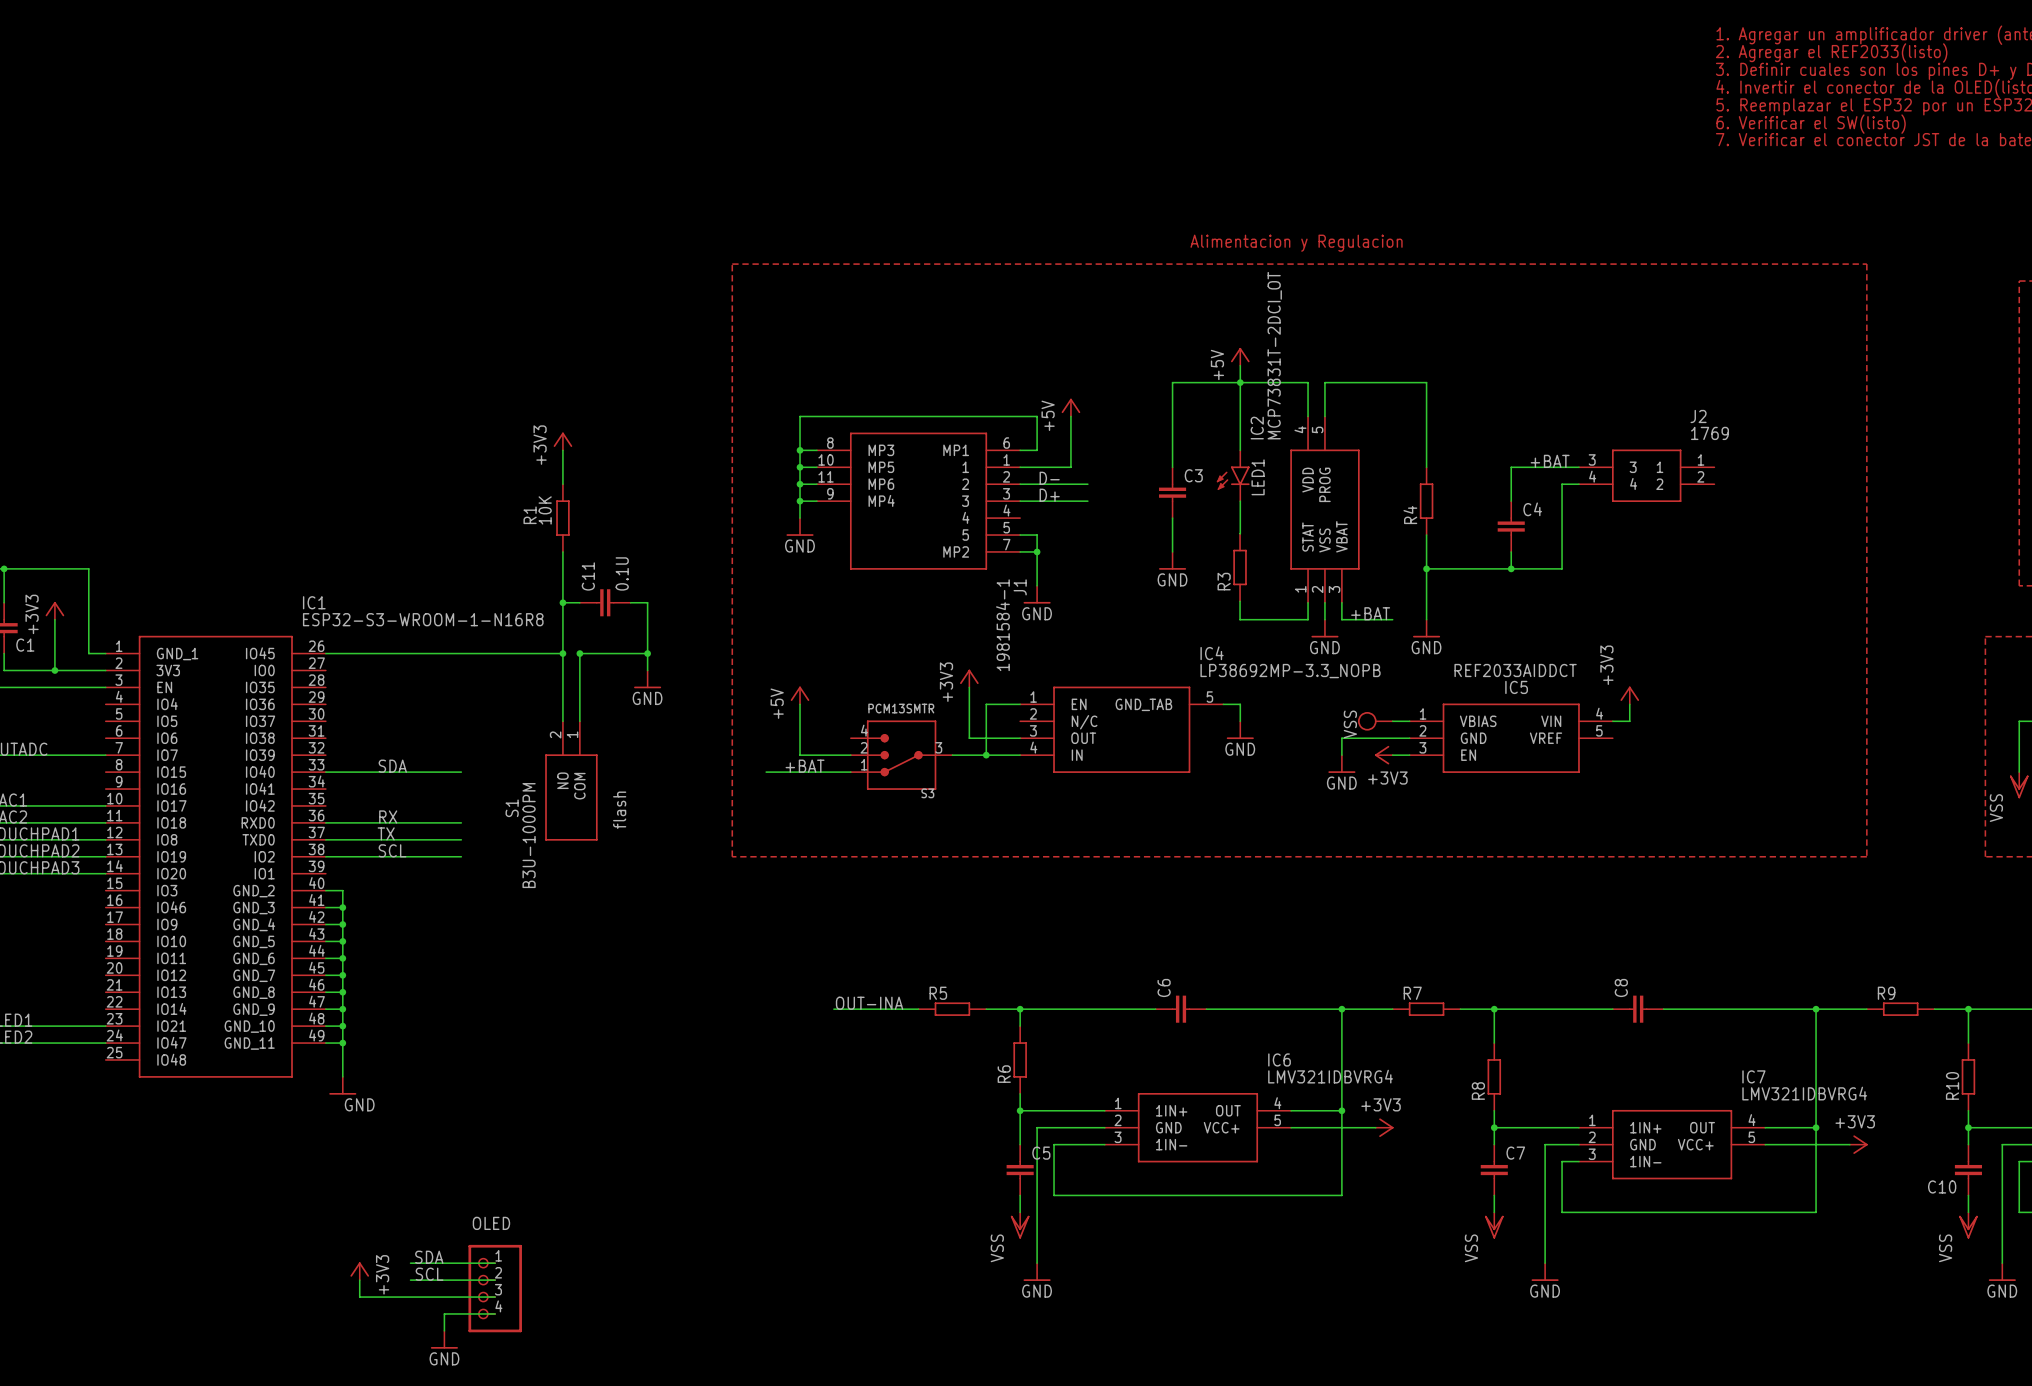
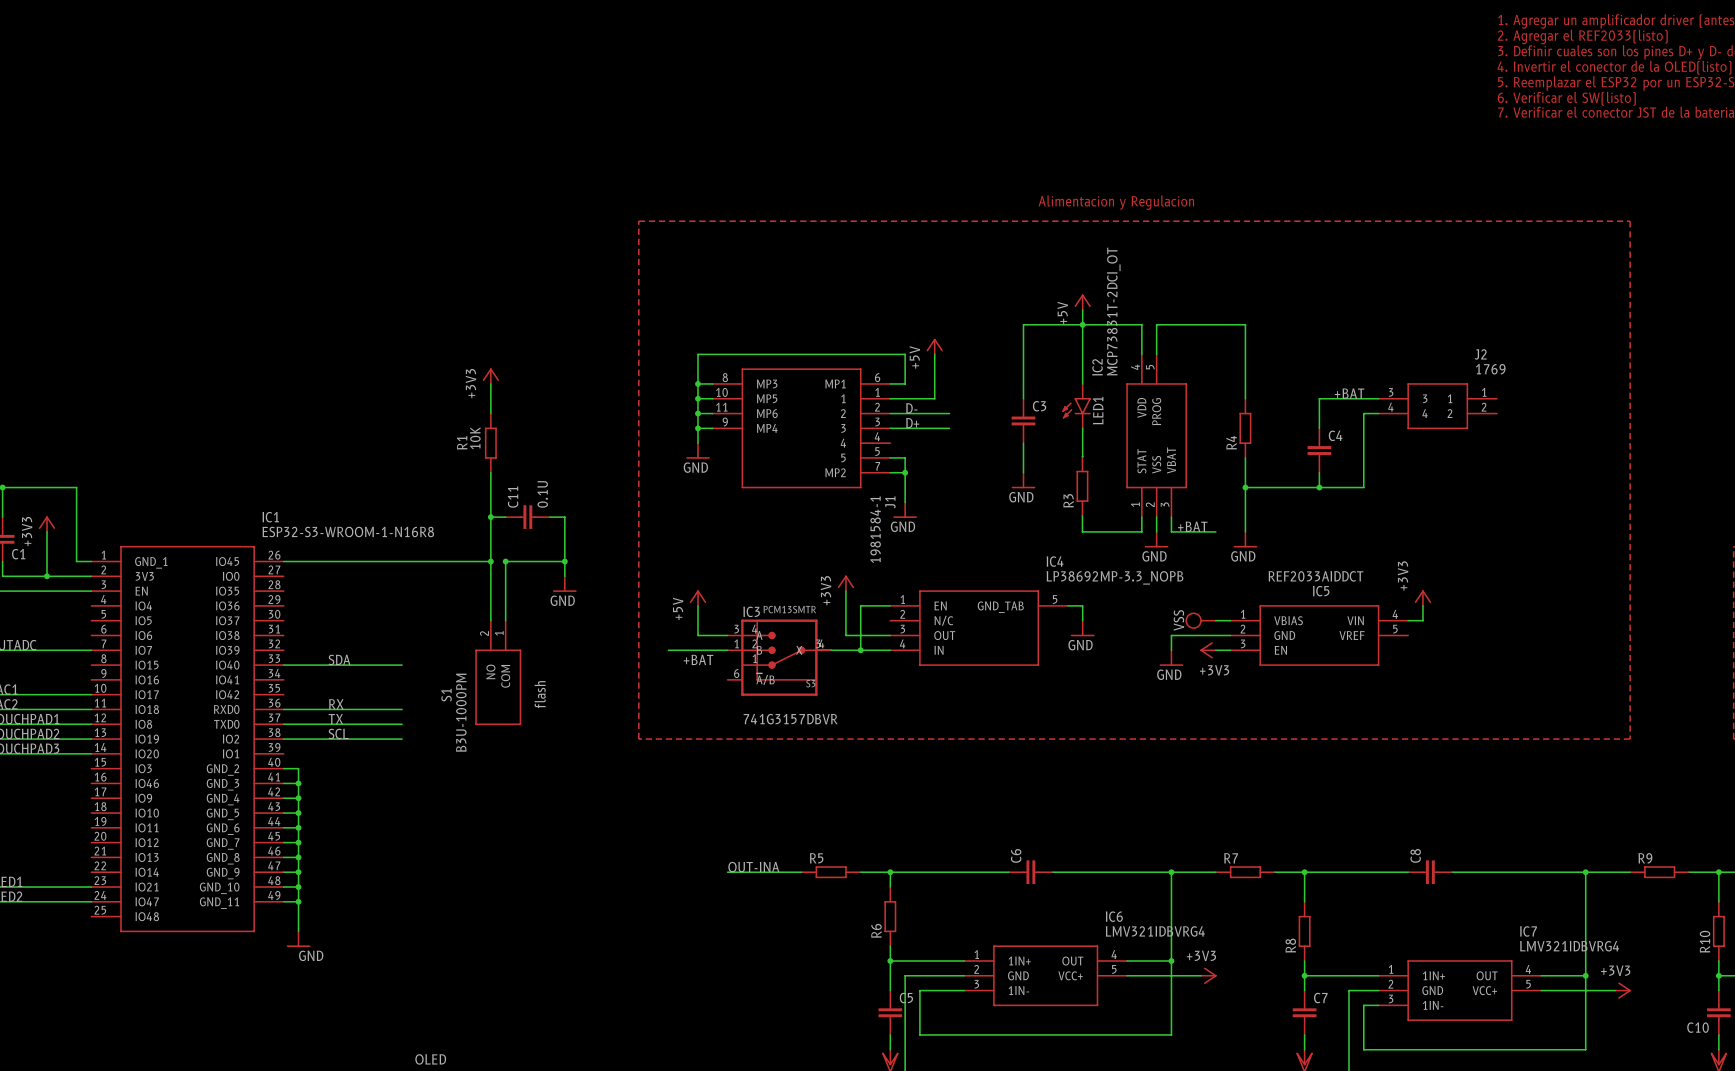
wire: (800, 738) (800, 755) -> (668, 650) (698, 650)
wire: none -> (698, 635) (727, 635)
IC3: none -> 741G3157DBVR (779, 657)
wire: (766, 772) (850, 772) -> none

